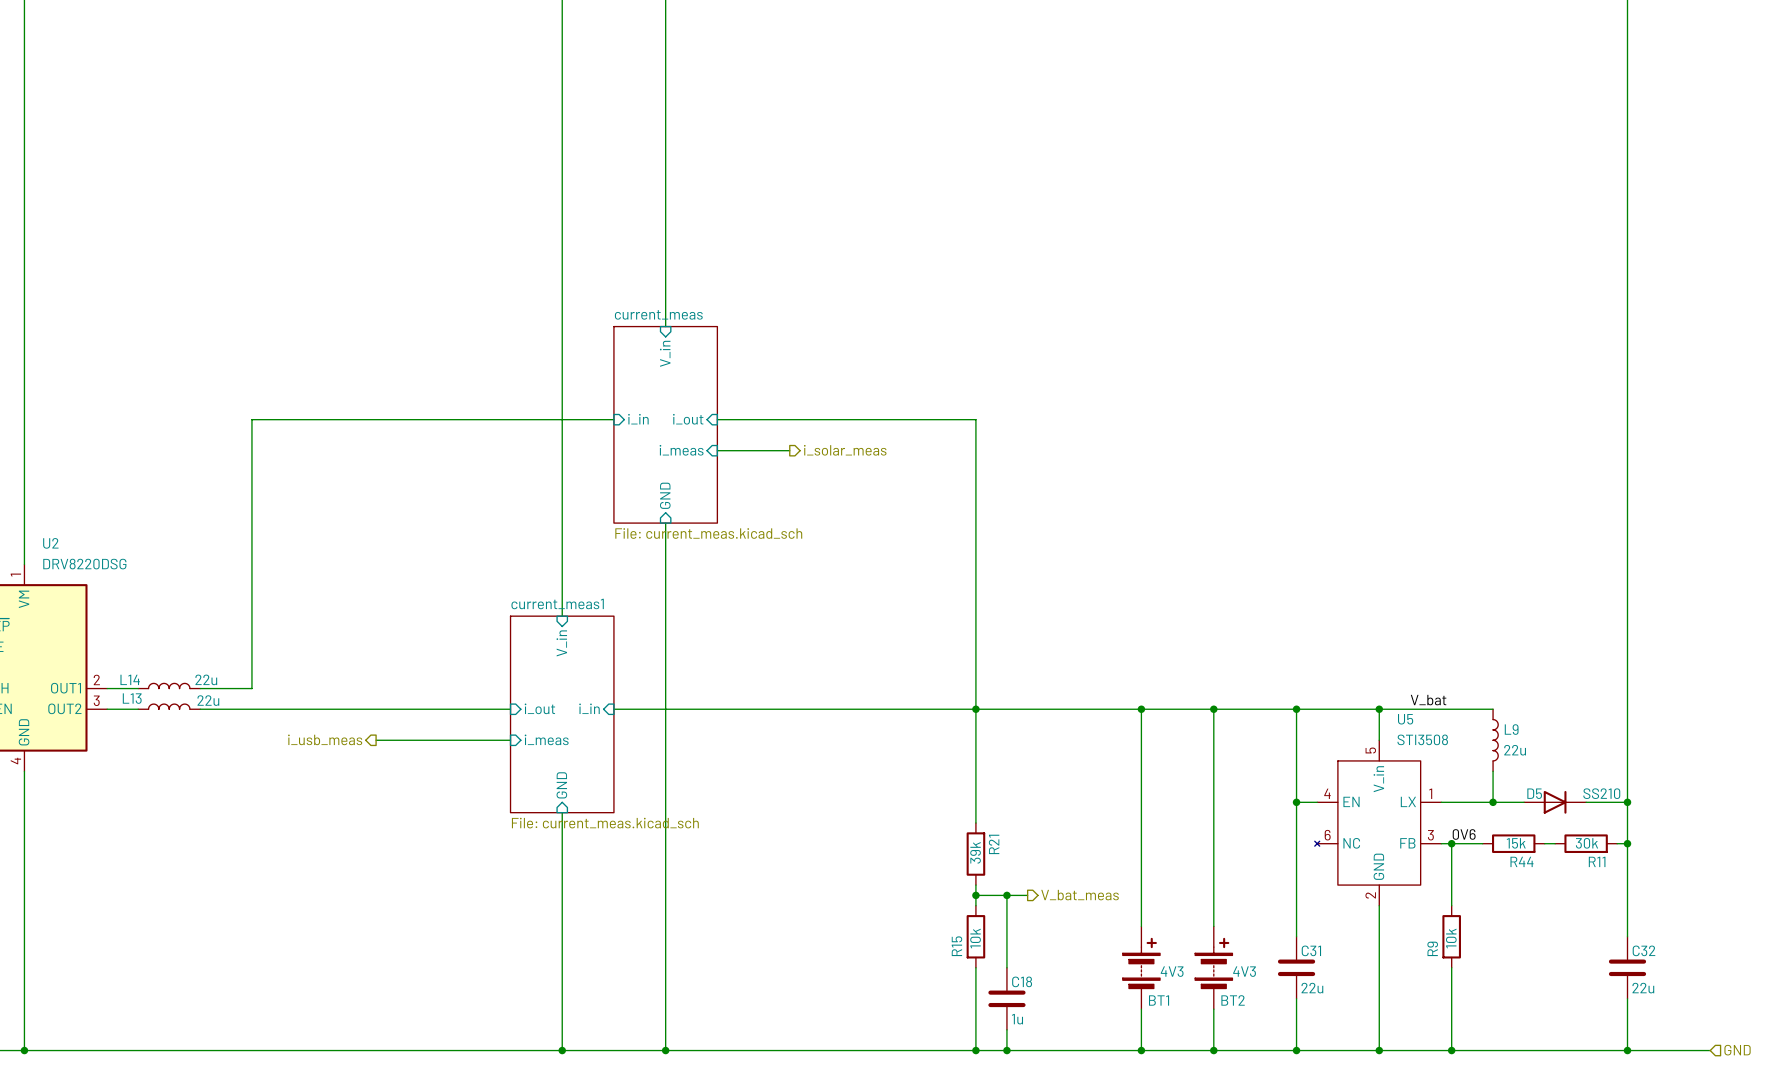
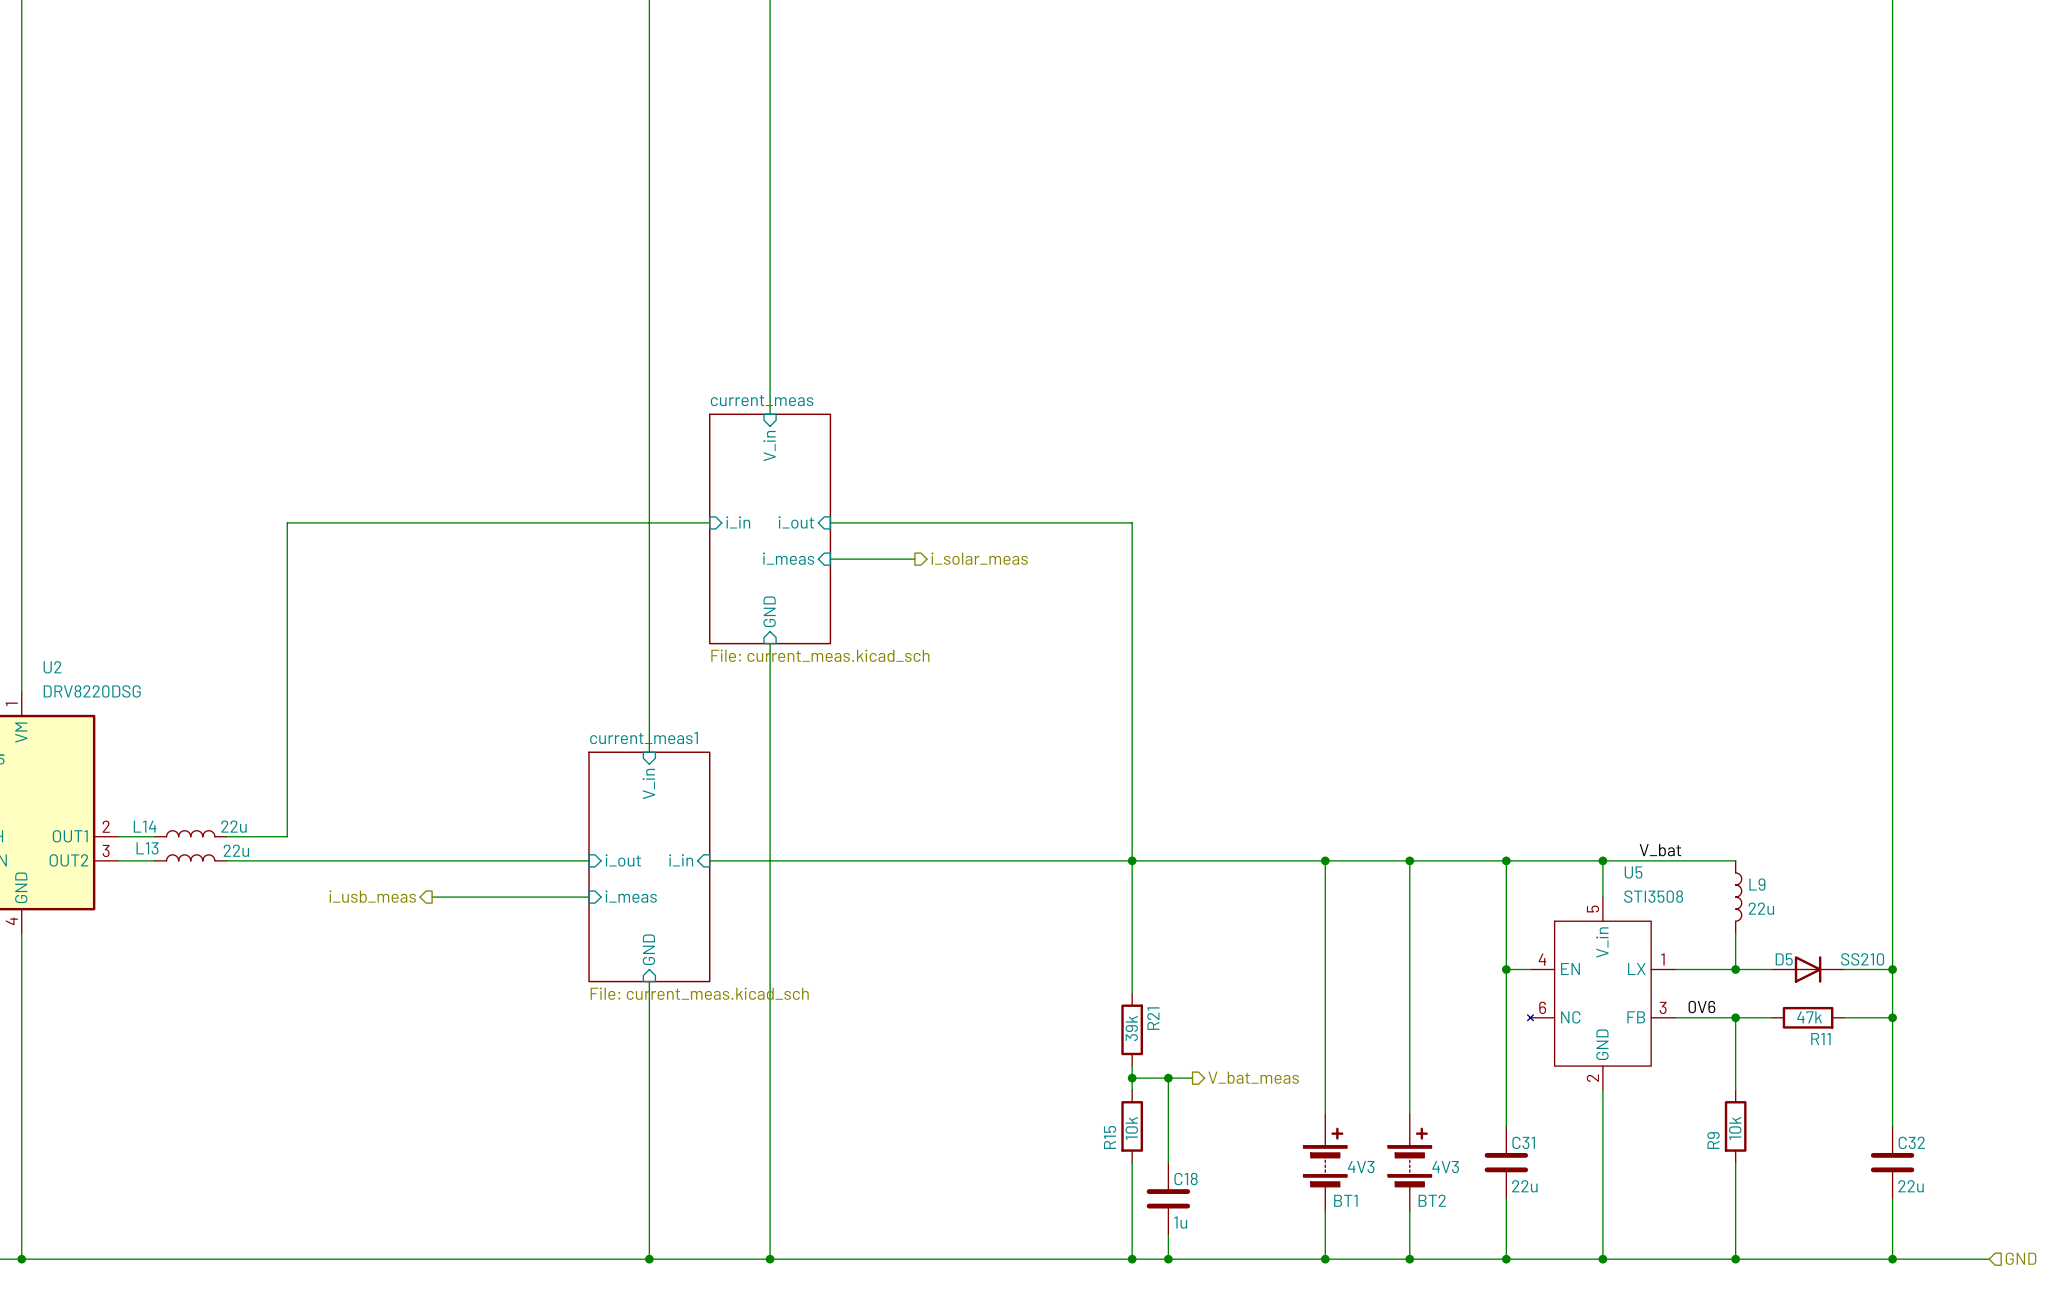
wire: (1451, 843) (1451, 905) -> (1735, 1017) (1735, 1090)
junction position: (1451, 843) -> (1735, 1017)
wire: none -> (1723, 1017) (1771, 1017)
R44: 15k (1513, 843) -> none
wire: (1544, 843) (1555, 843) -> none
wire: none -> (1844, 1017) (1880, 1017)
R11 position: (1586, 843) -> (1808, 1017)
R11 value: 30k (1587, 843) -> 47k (1809, 1017)
R9 position: (1451, 936) -> (1735, 1126)
wire: (1451, 967) (1451, 1050) -> (1735, 1162) (1735, 1259)
junction position: (1451, 1050) -> (1735, 1259)

